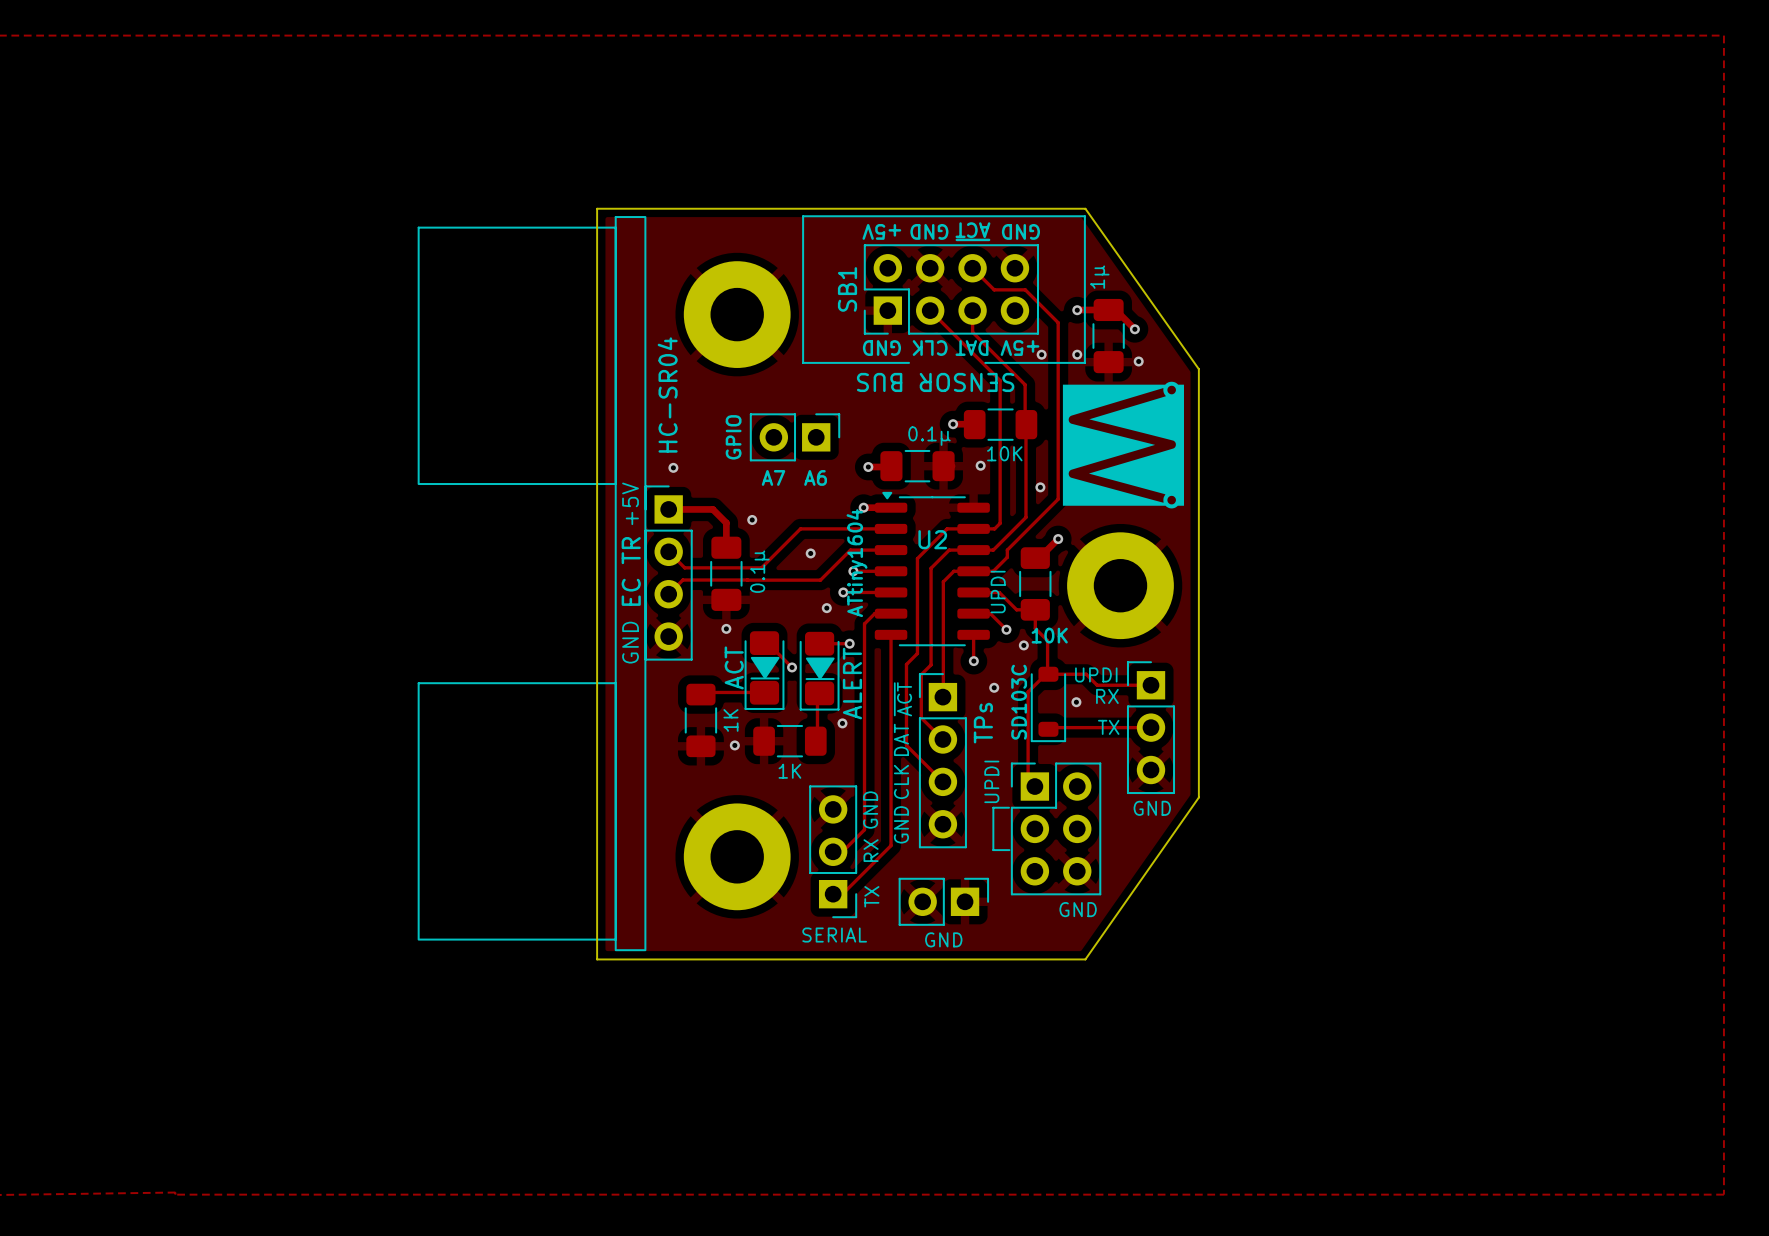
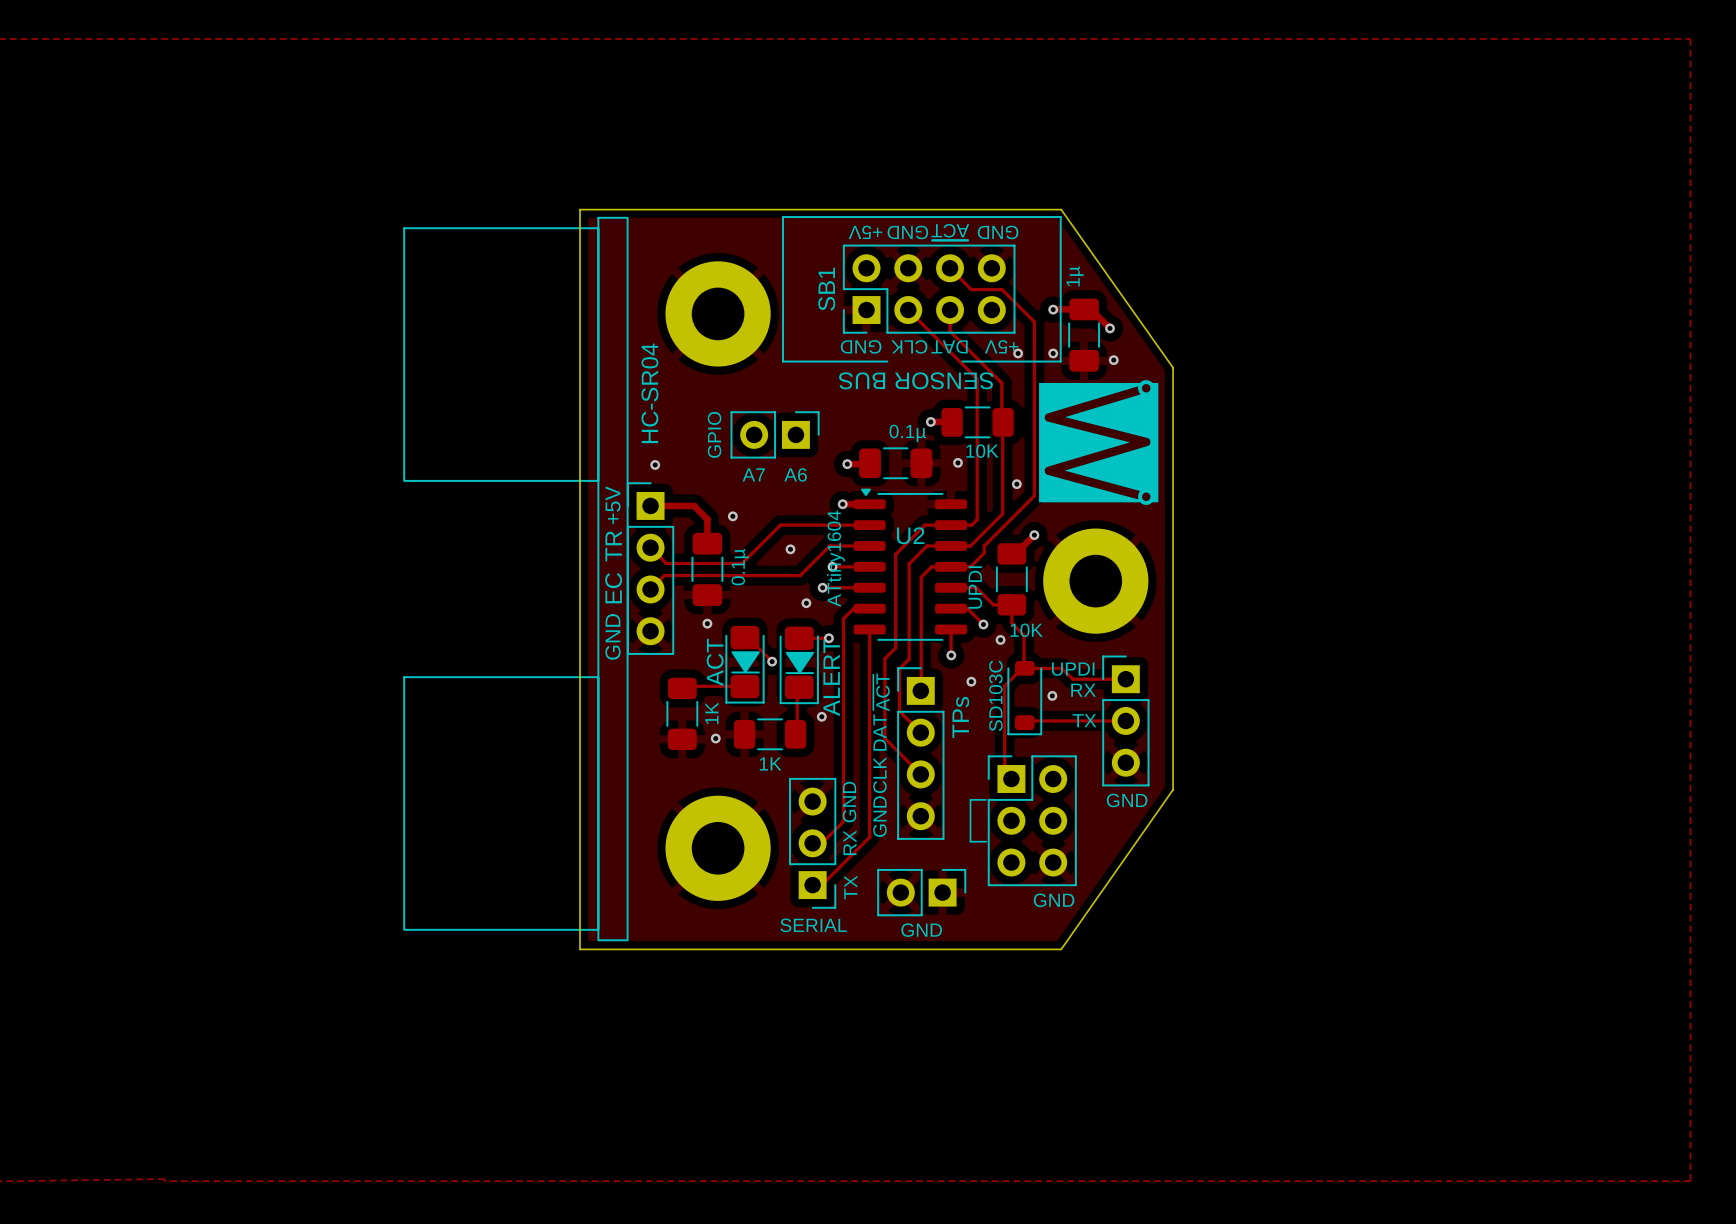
text: UPDI (991, 781) -> none

